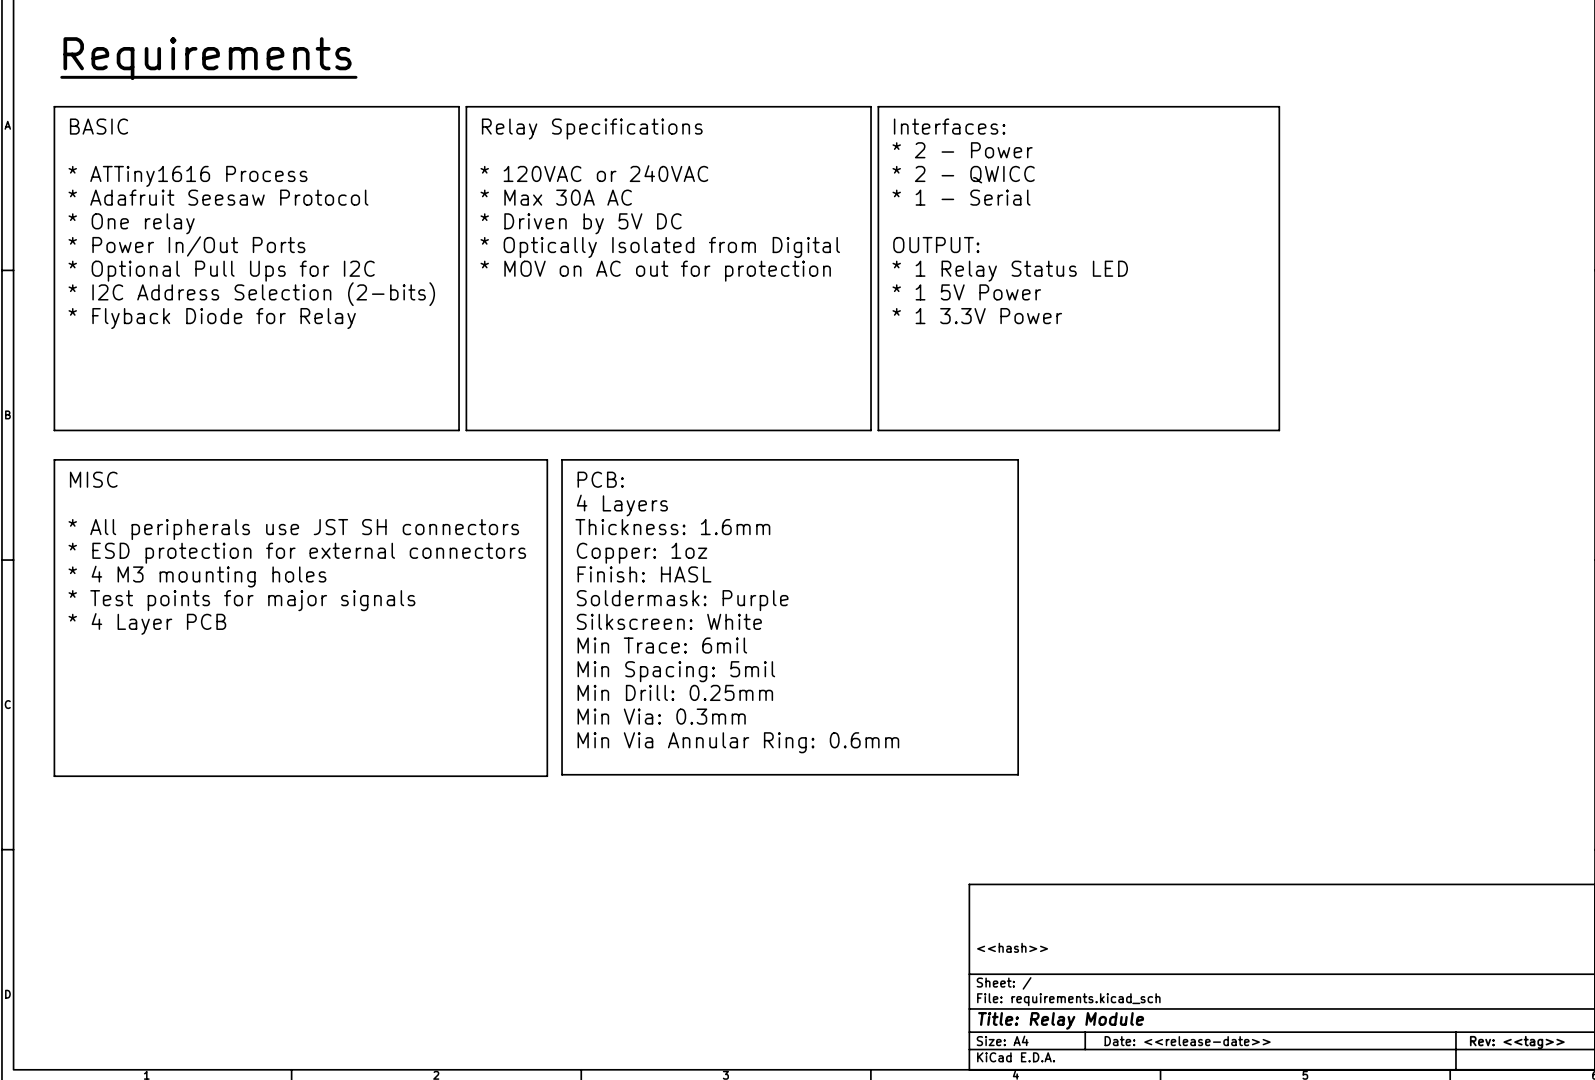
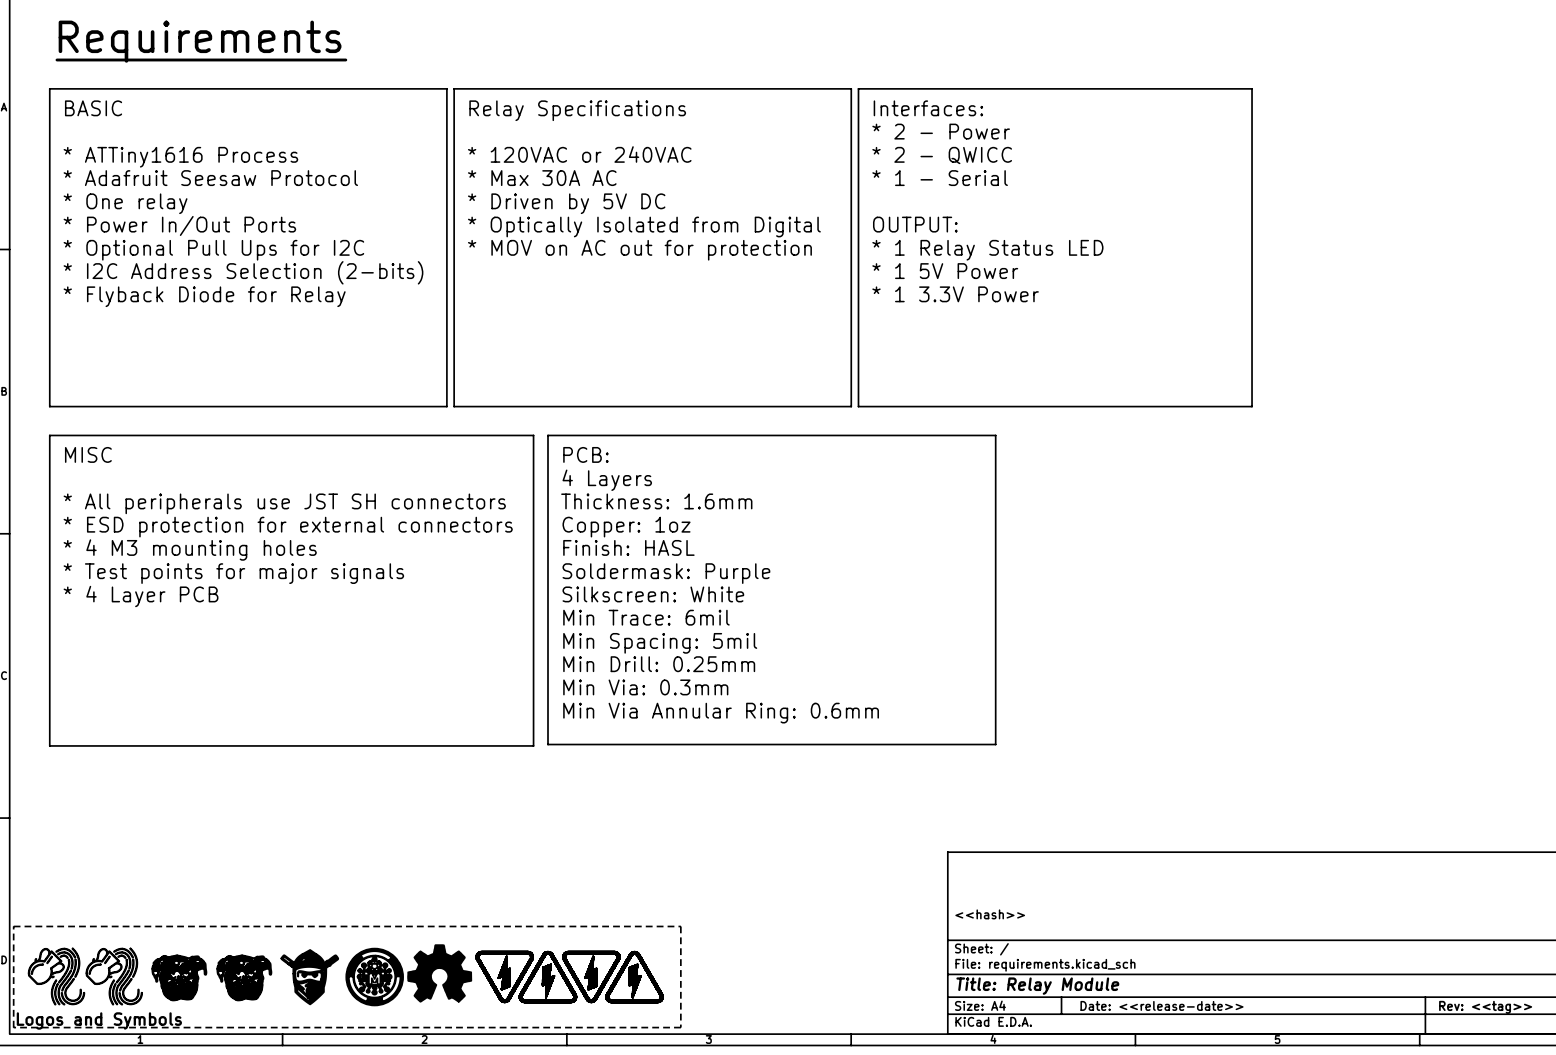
line: none -> (13, 926) (680, 926) (680, 1027) (13, 1027) (13, 926)
part: none -> (439, 973)
part: none -> (56, 976)
part: none -> (114, 976)
part: none -> (309, 977)
part: none -> (374, 977)
part: none -> (504, 977)
part: none -> (547, 977)
part: none -> (591, 977)
part: none -> (634, 977)
part: none -> (179, 977)
part: none -> (244, 977)
text: none -> Logos and Symbols (99, 1020)

